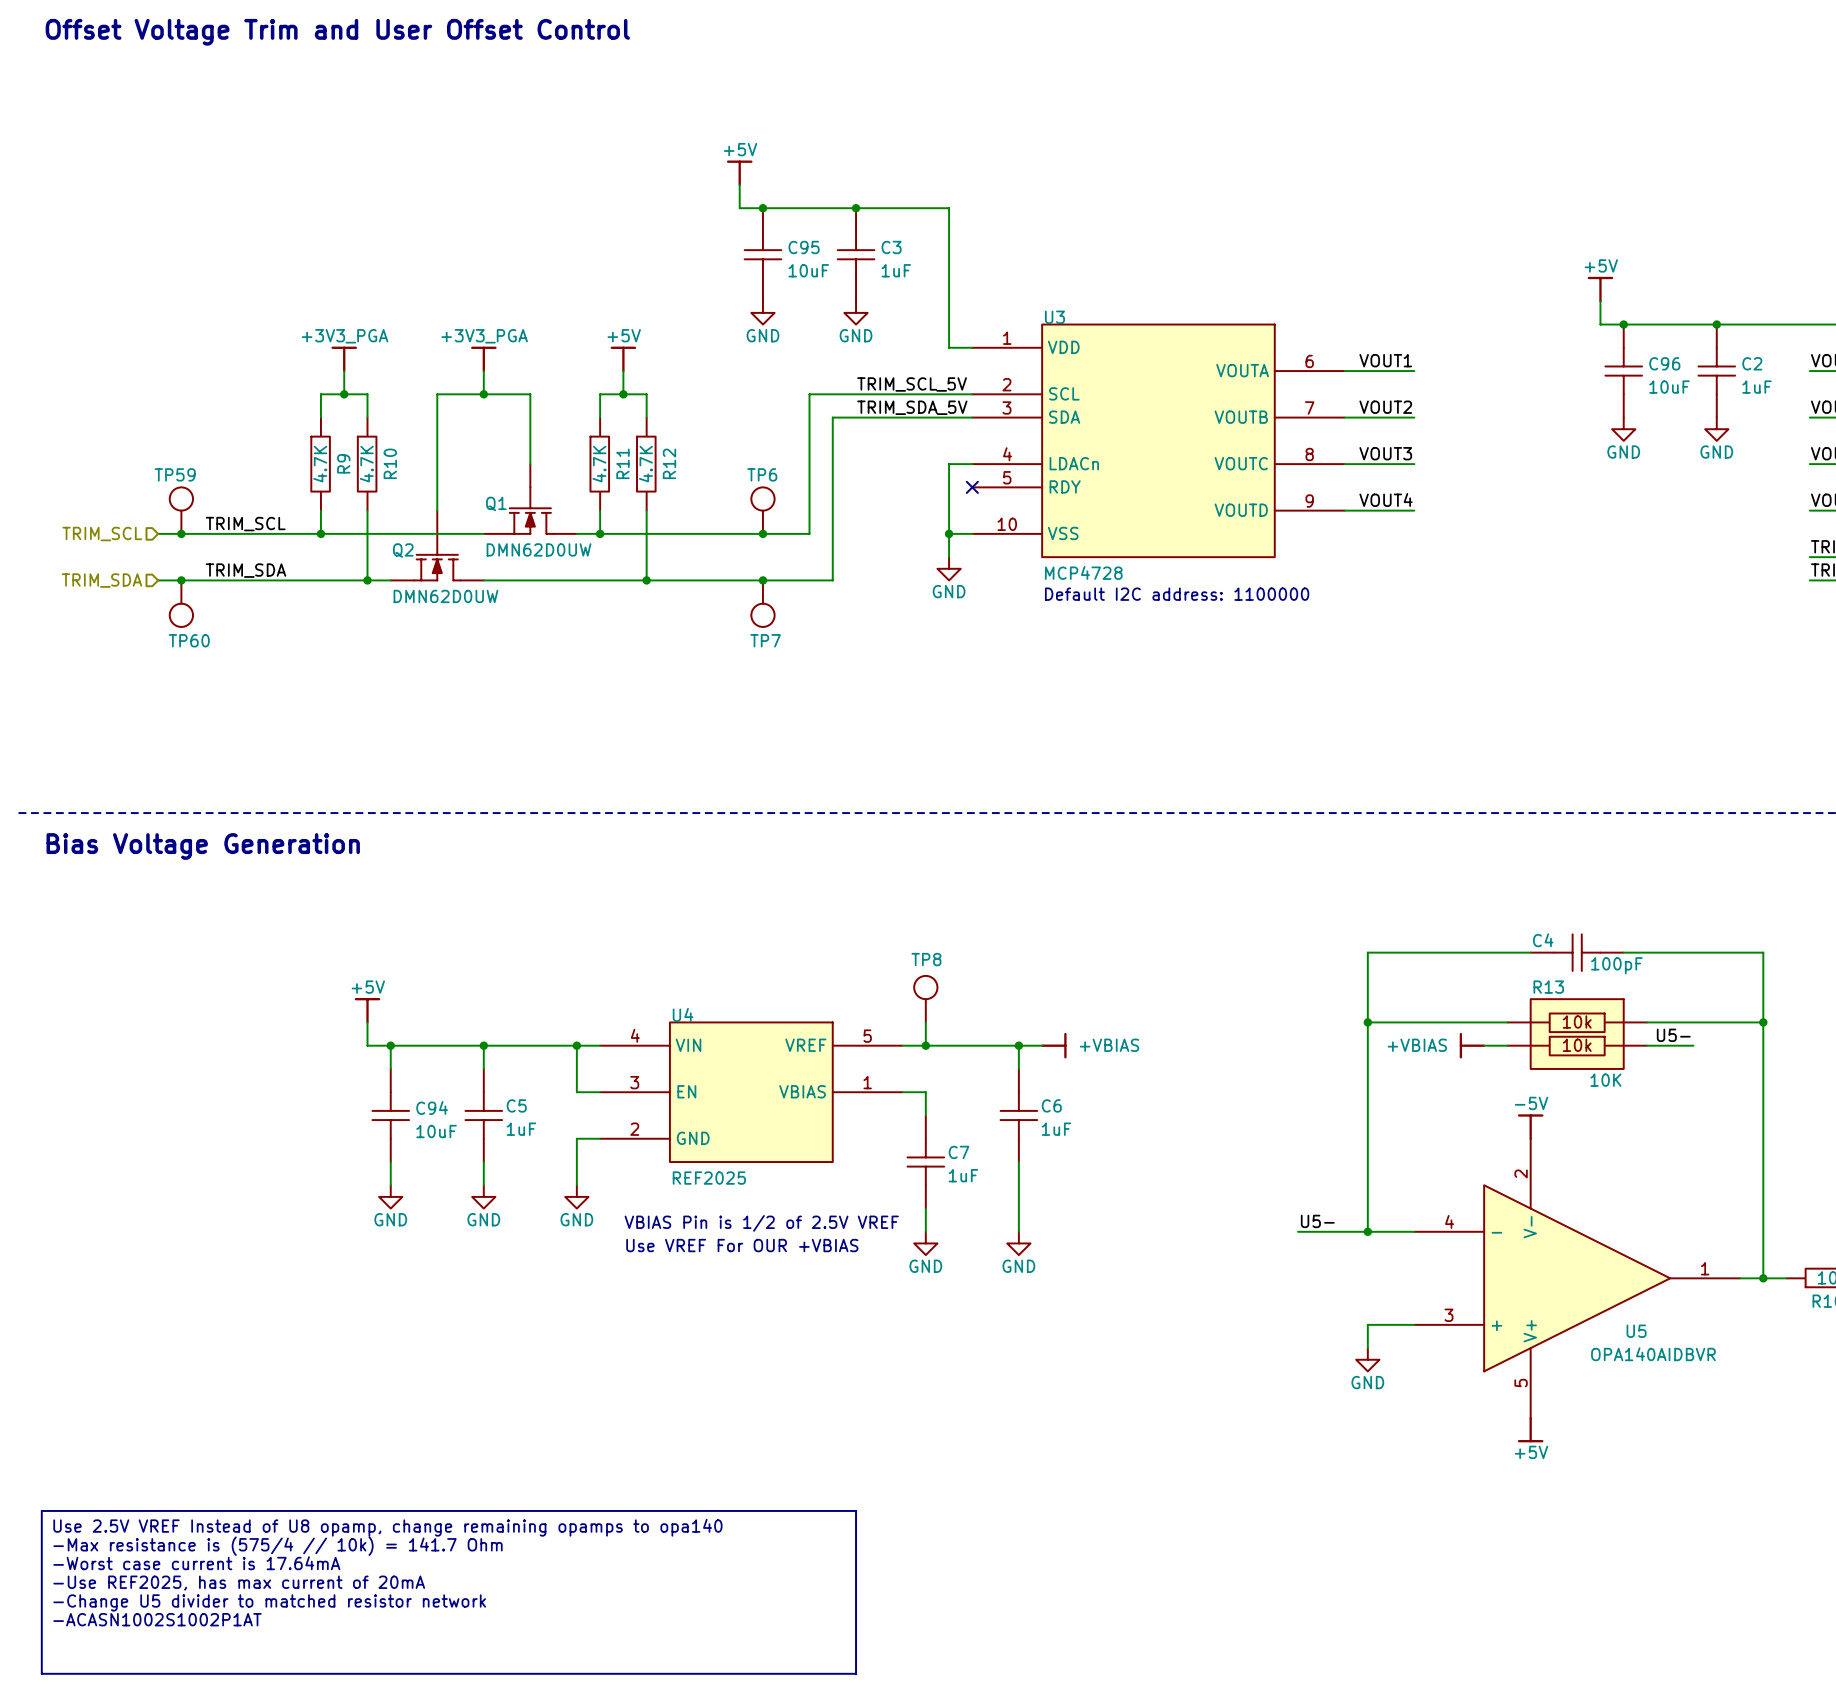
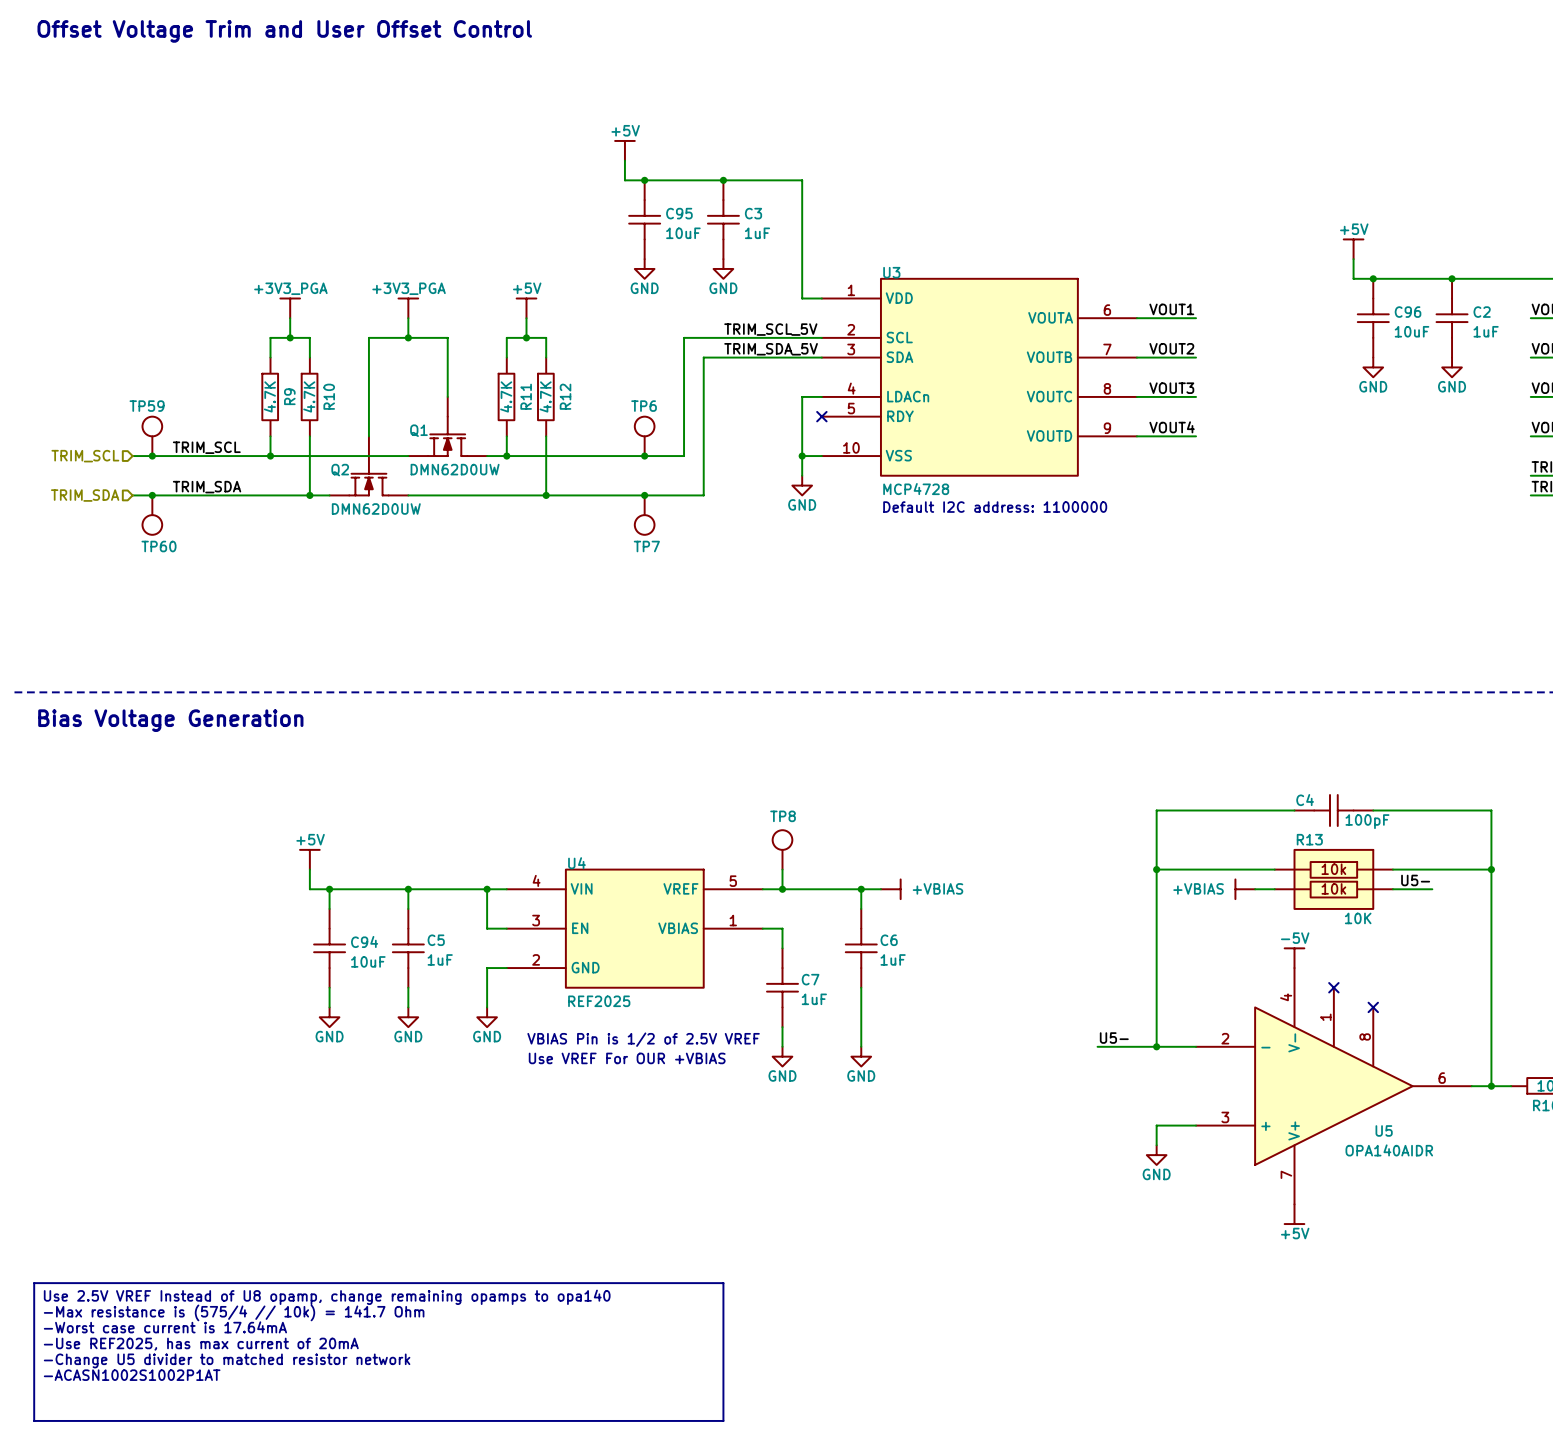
U5 symbol: [1414, 1138, 1741, 1418] -> [1196, 968, 1472, 1205]
no-connect mark: none -> (1333, 987)
no-connect mark: none -> (1373, 1007)
U5 value: OPA140AIDBVR (1653, 1354) -> OPA140AIDR (1389, 1150)

